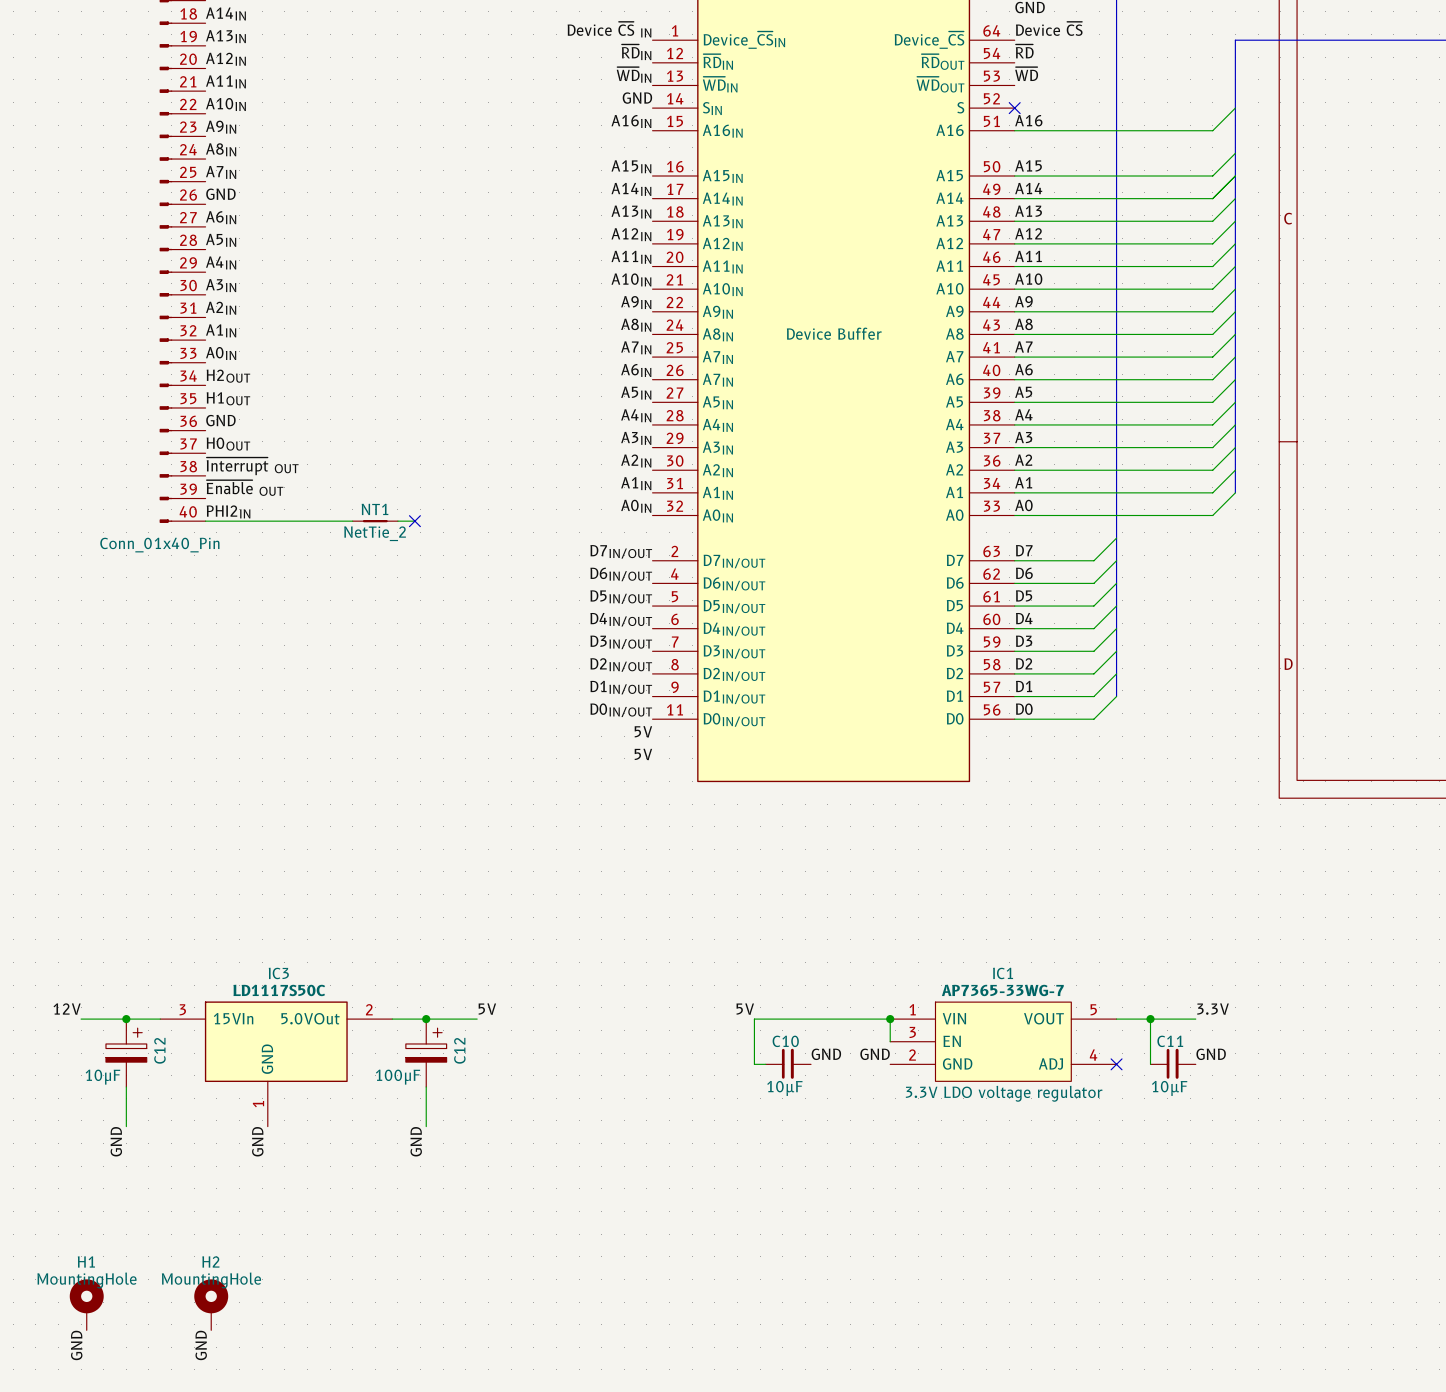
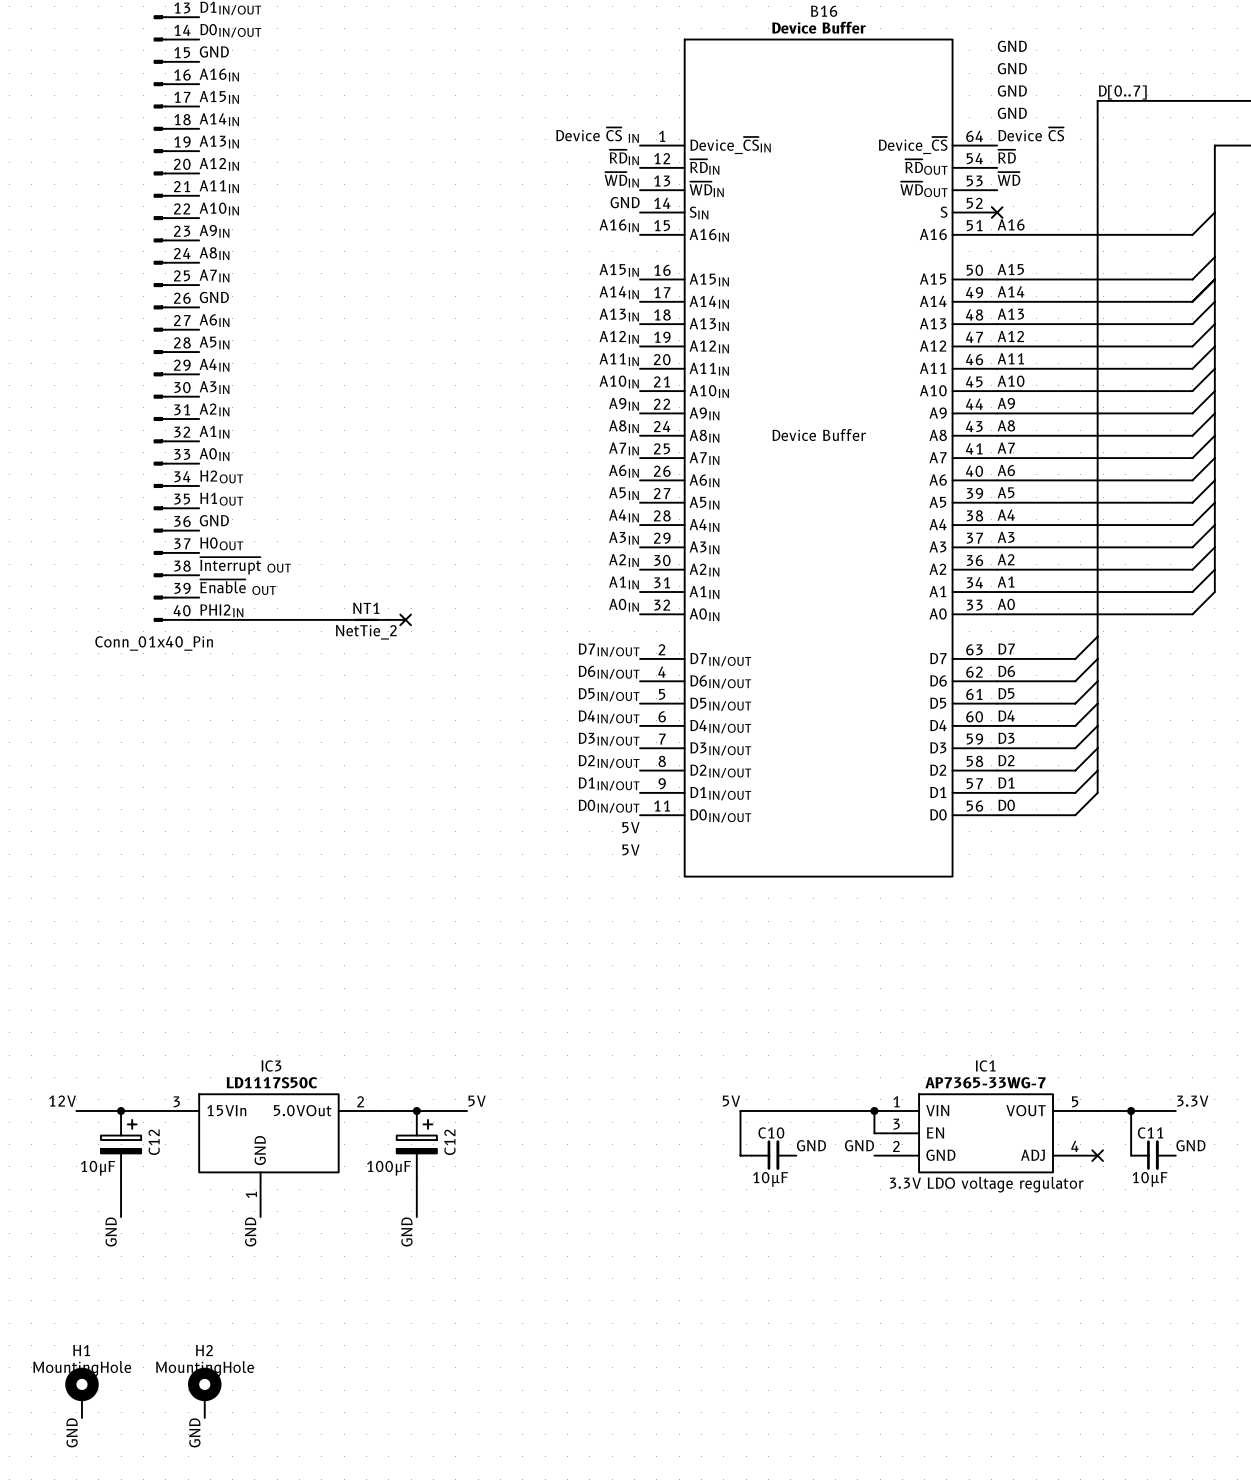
B16 pin name: A7IN (717, 380) -> A6IN (704, 480)

